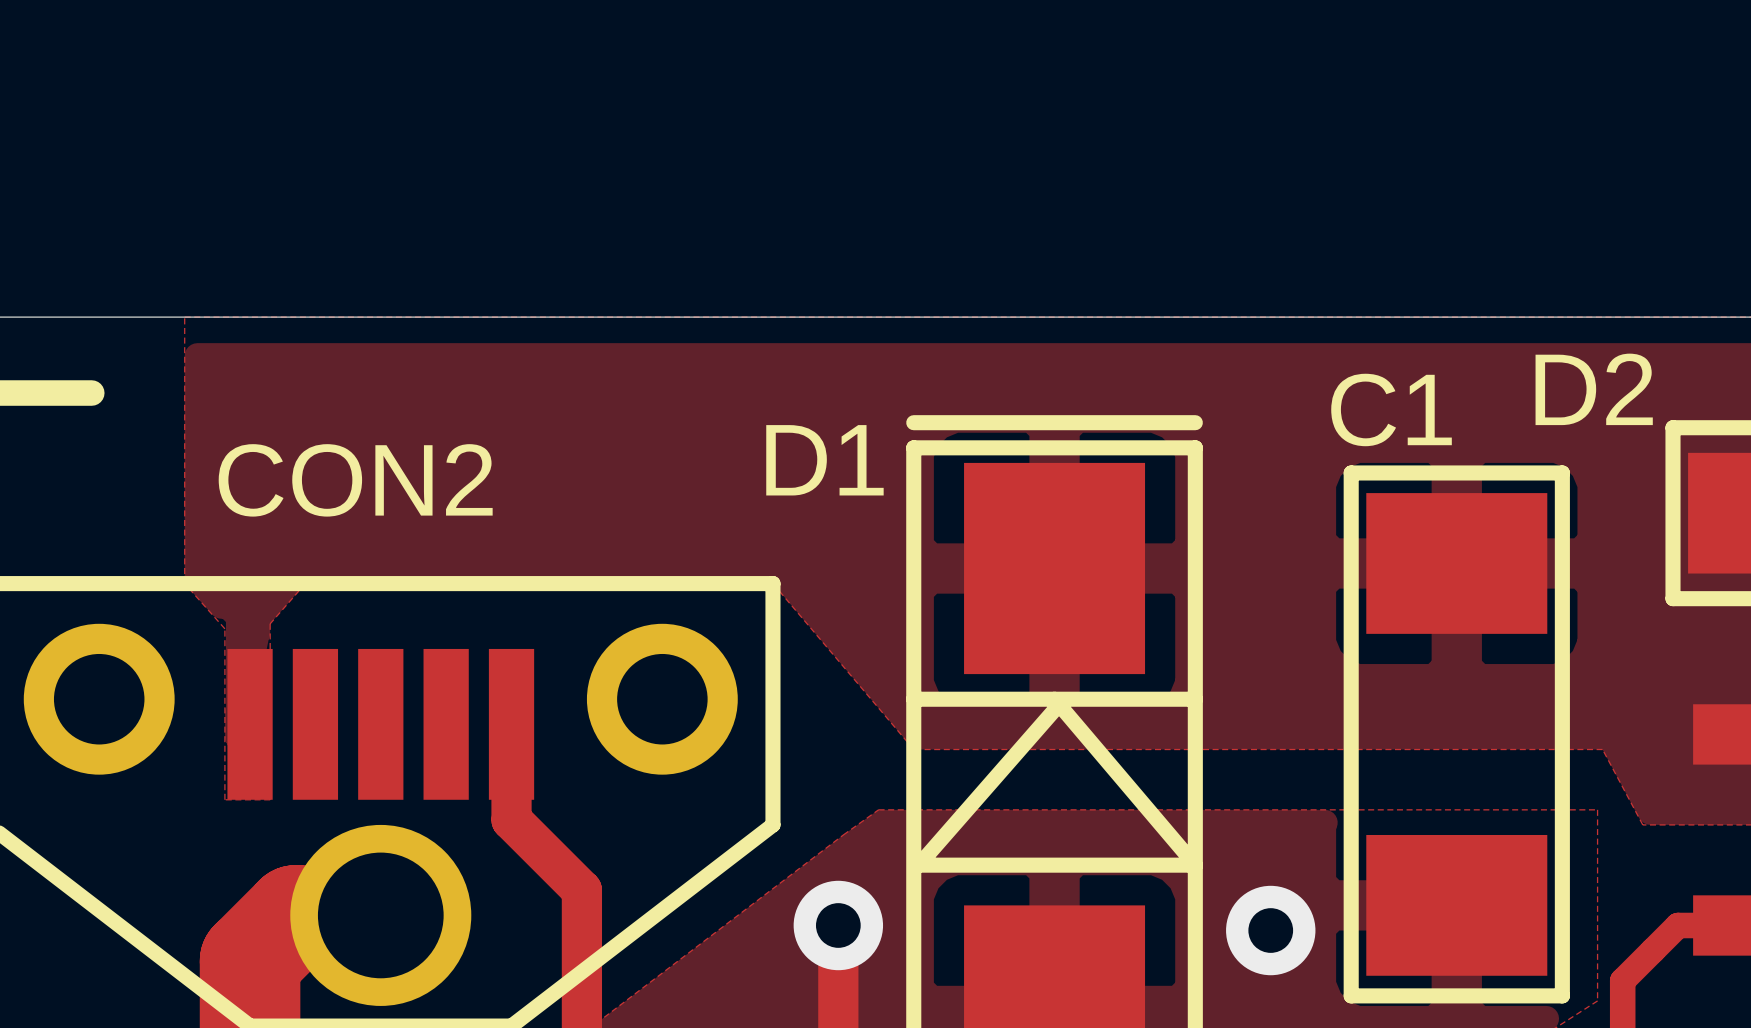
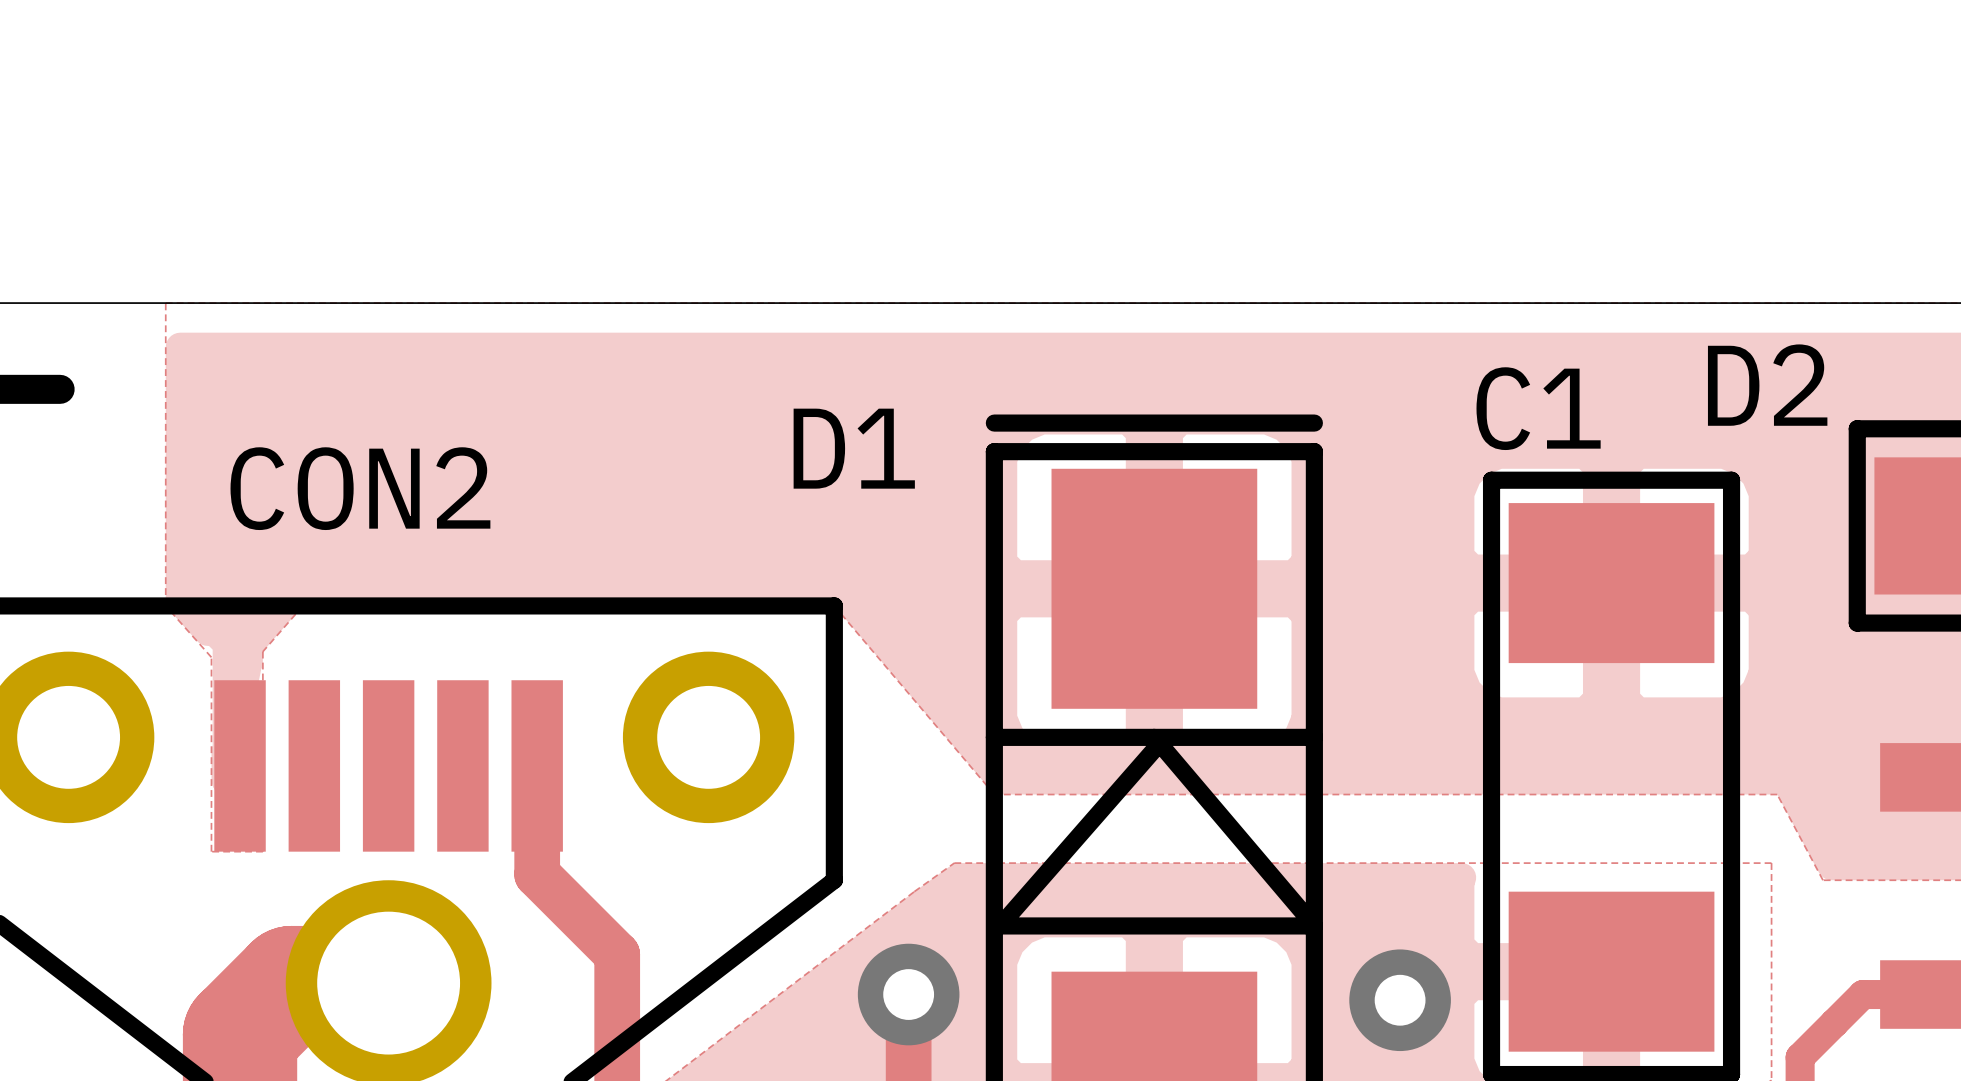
D1 name position: D1 (824, 460) -> D1 (854, 448)

